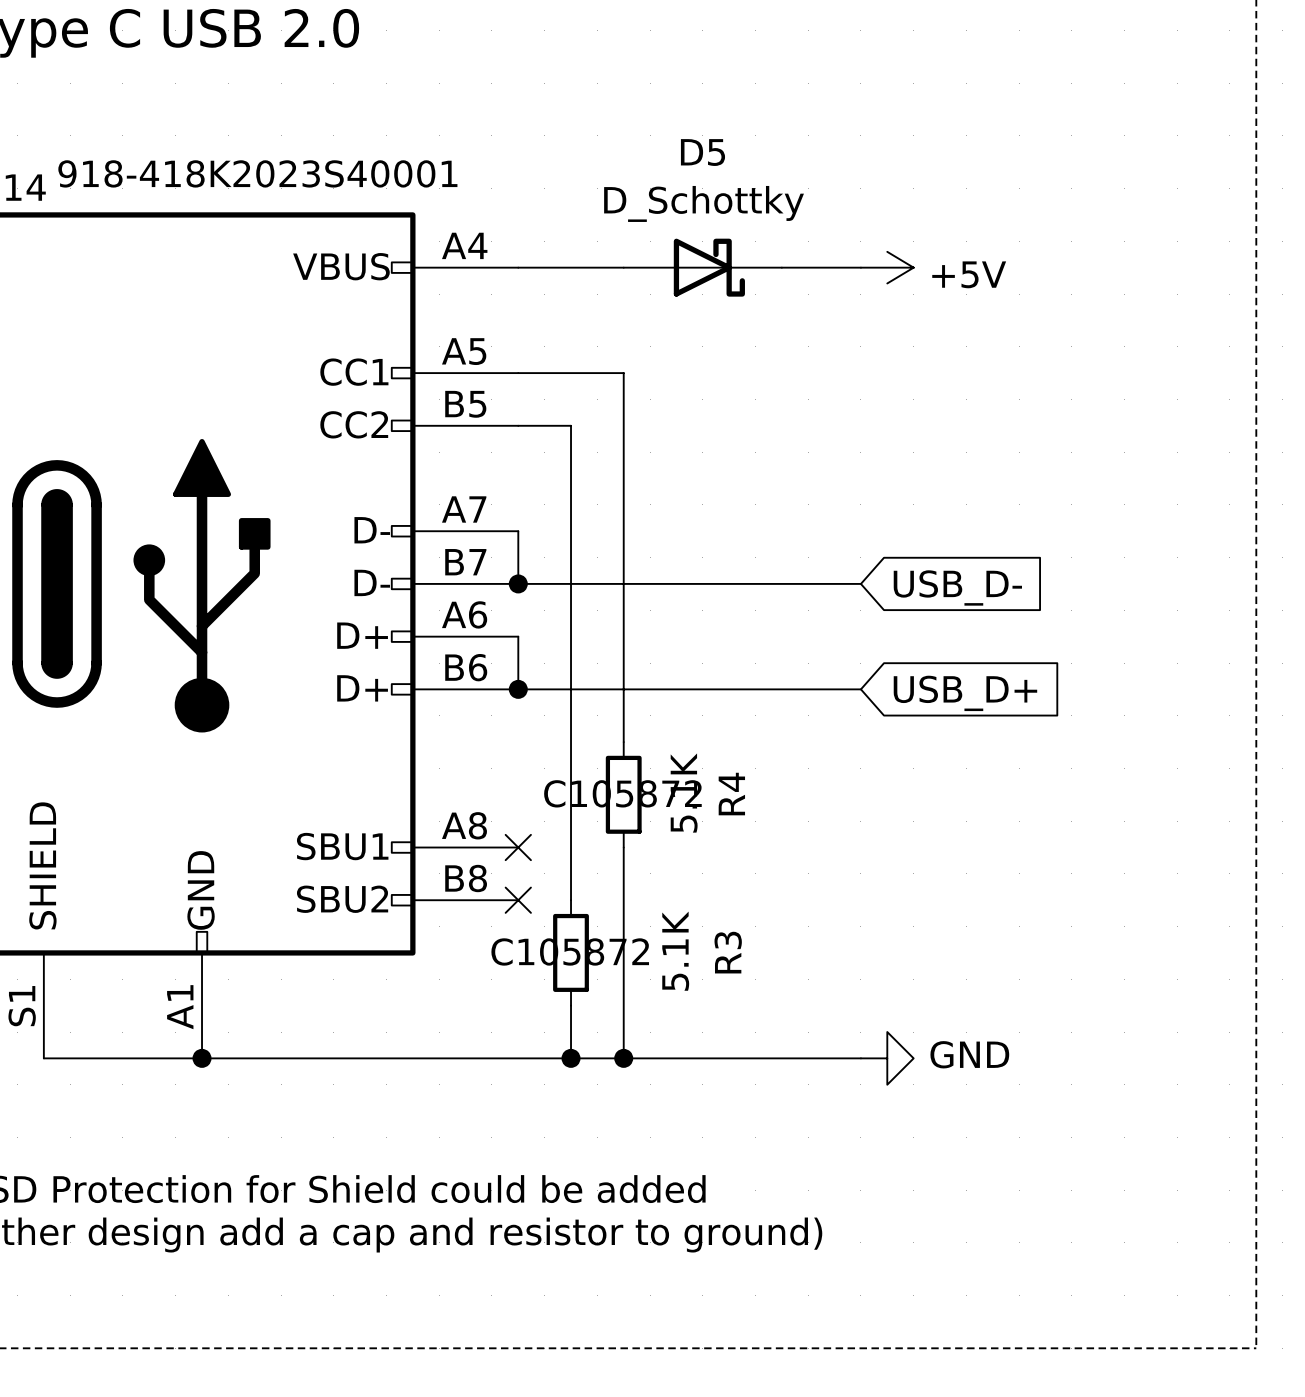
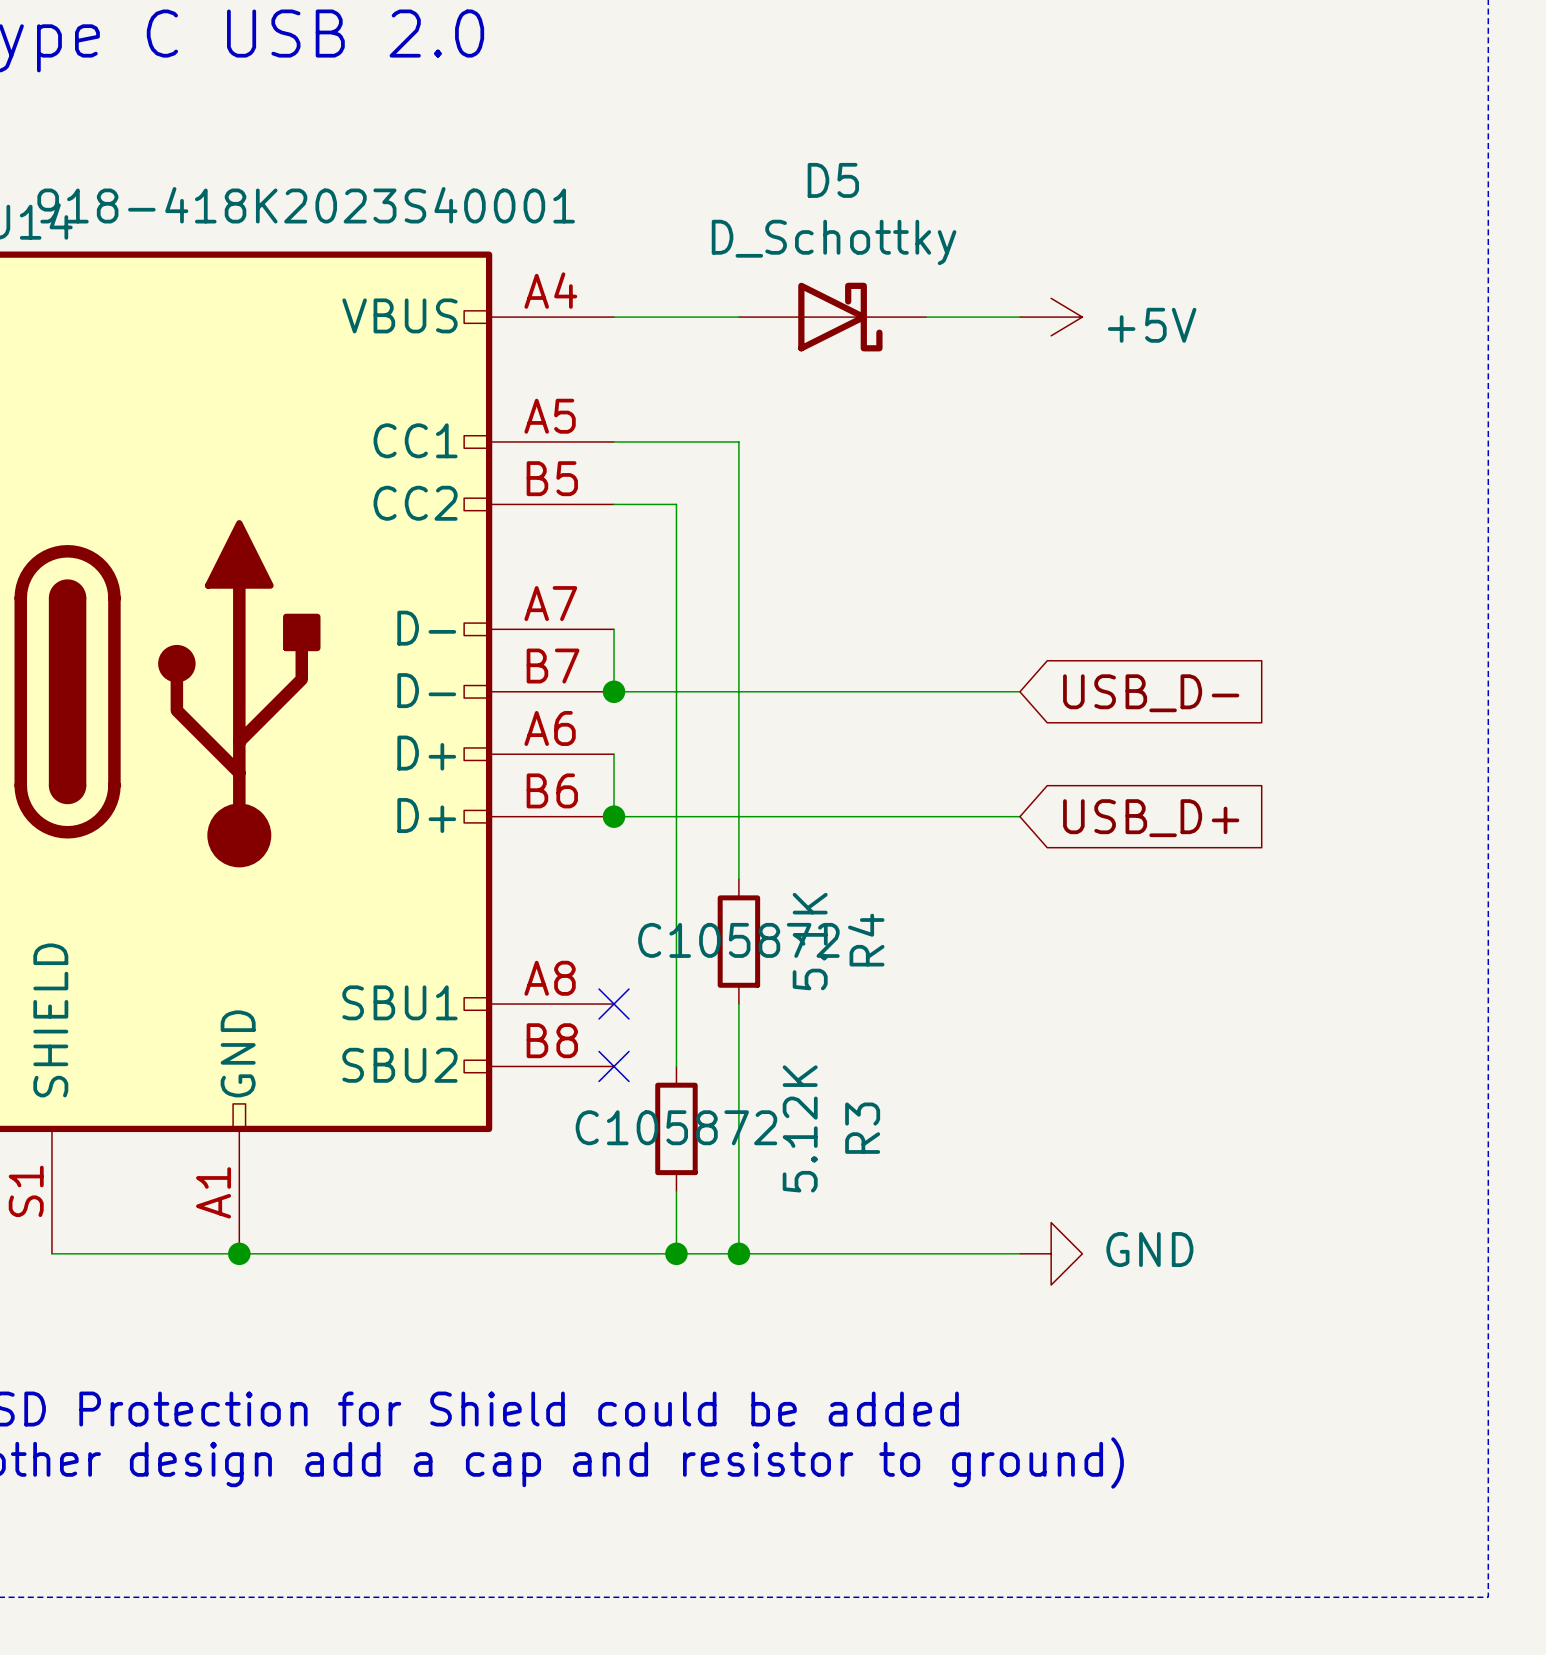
R3 value: 5.1K (675, 951) -> 5.12K (800, 1128)

